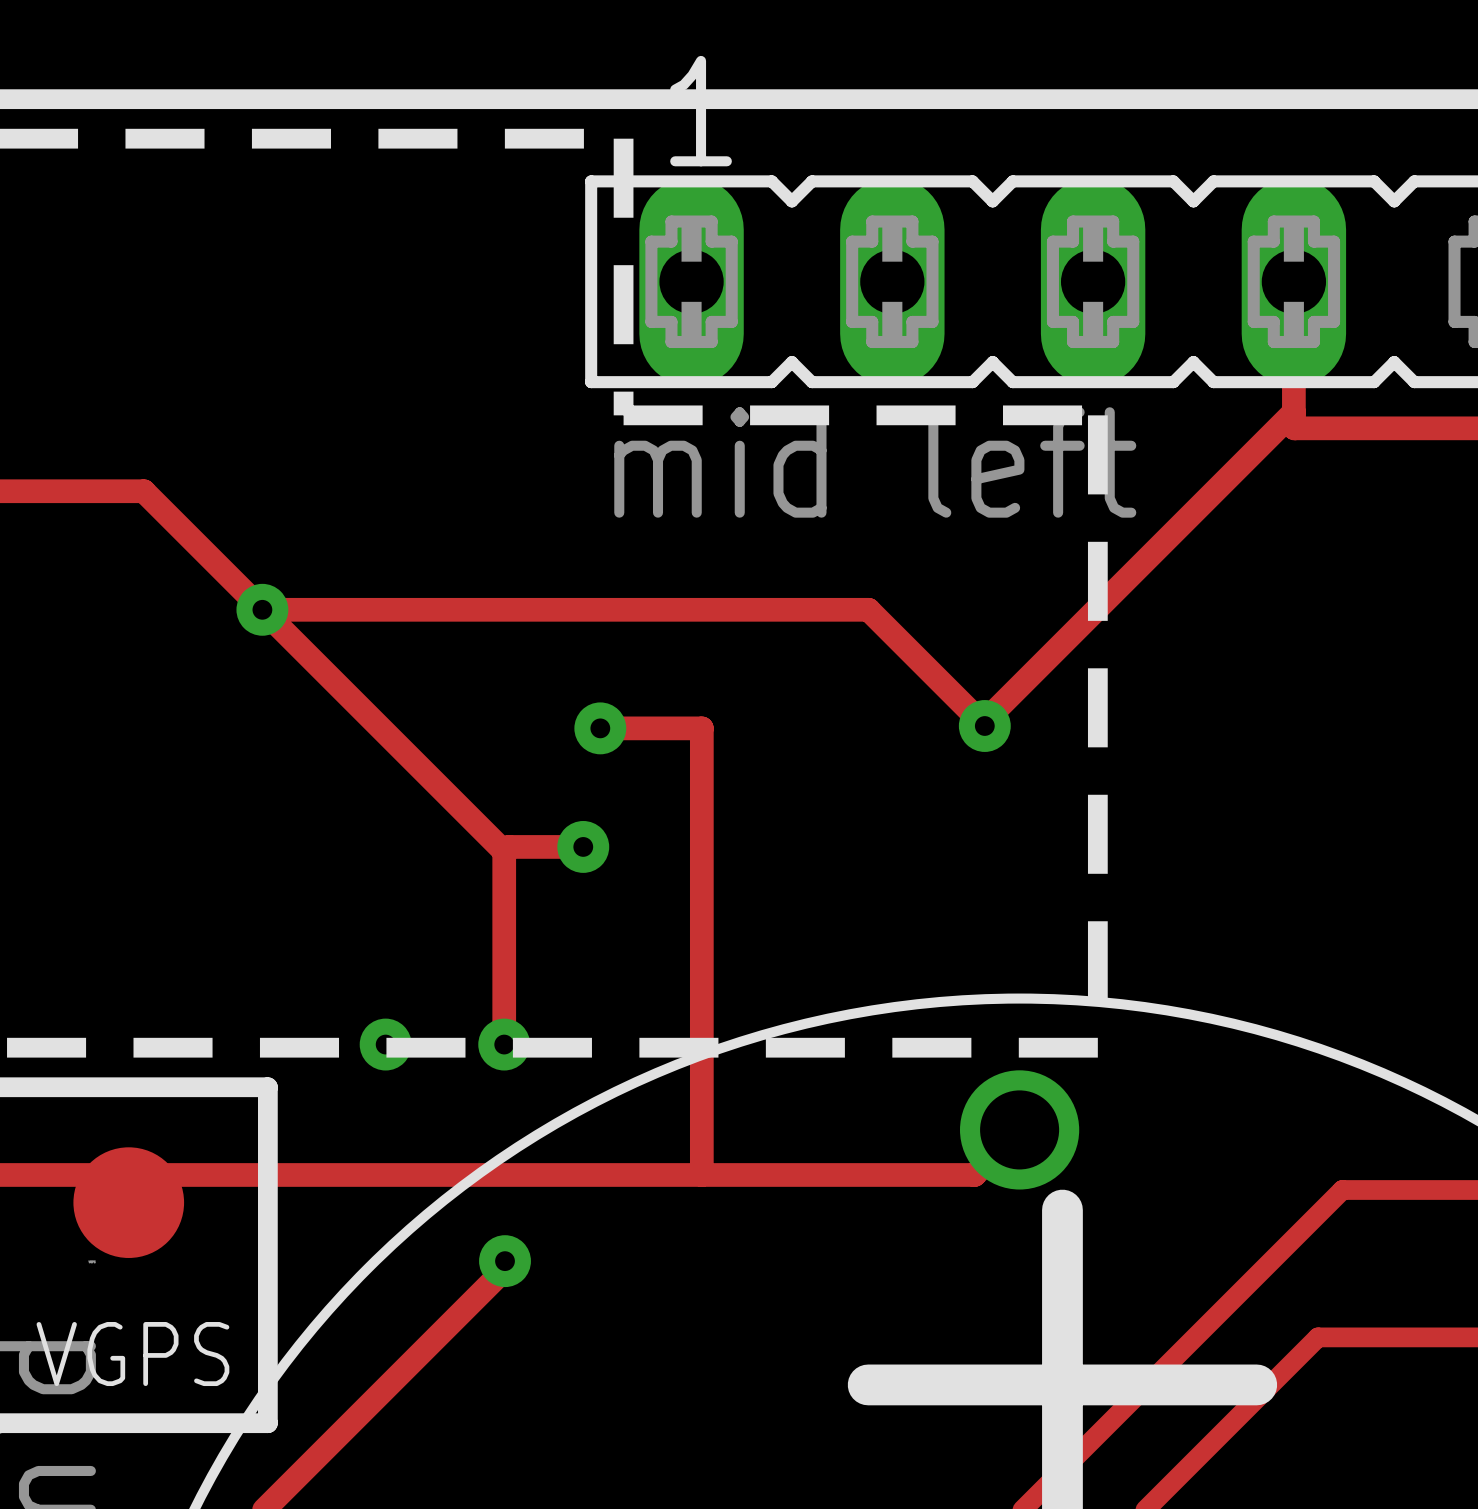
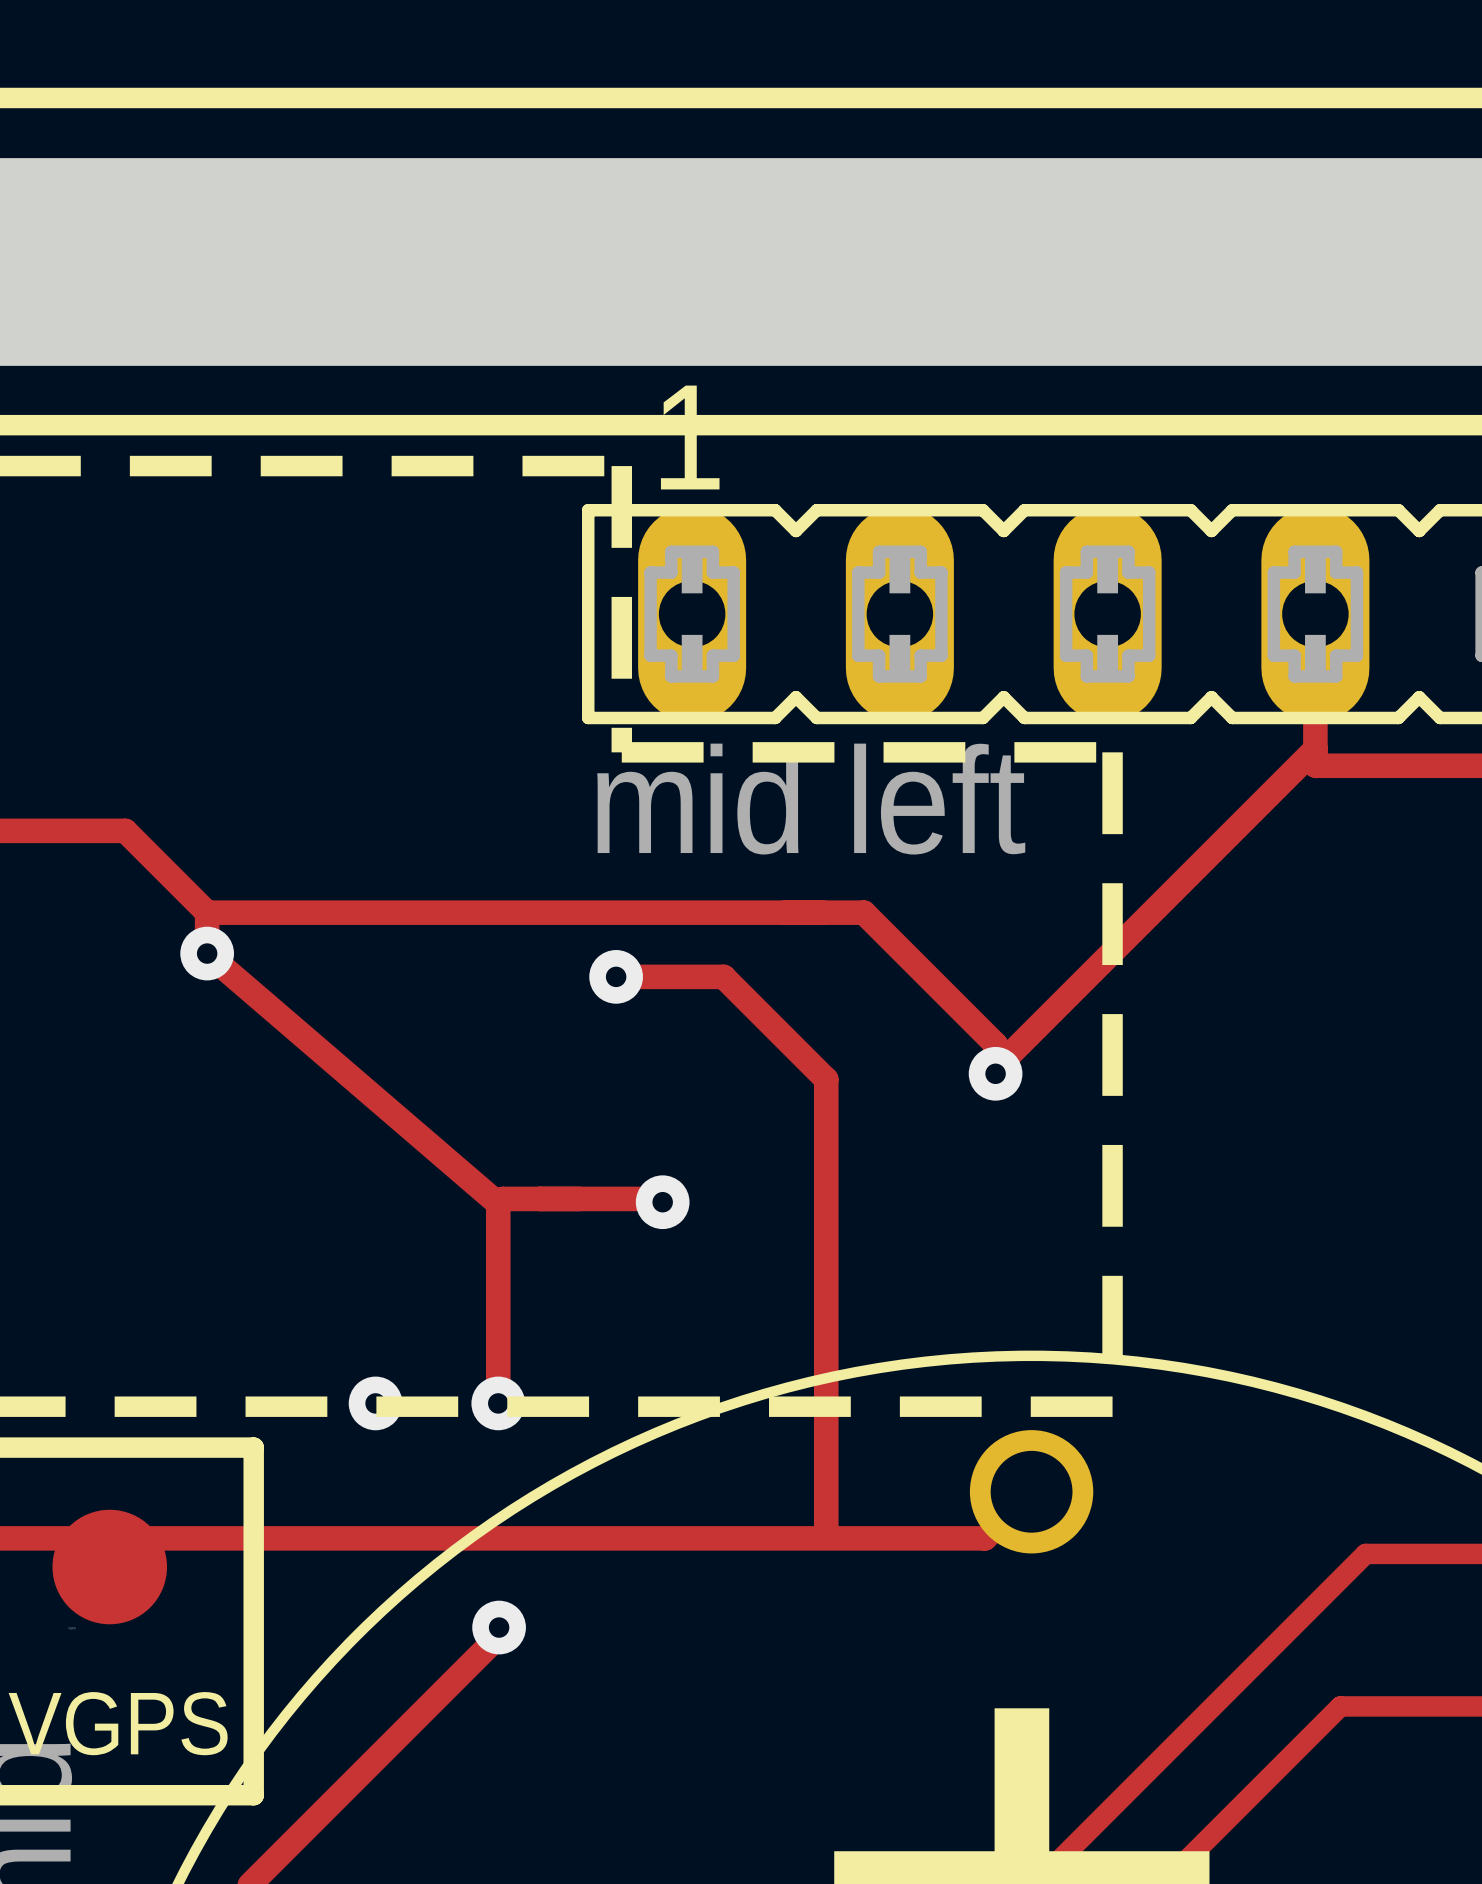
track: (222, 570) (504, 851) -> none
track: (262, 609) (868, 609) (984, 726) -> (498, 1203) (207, 953) (207, 912) (863, 912) (995, 1044) (995, 1073)
via position: (262, 609) -> (207, 953)
track: none -> (616, 976) (723, 976) (826, 1079) (826, 1529)
via: none -> (616, 976)
track: (600, 728) (701, 728) (701, 1174) -> none
via: (600, 728) -> none
track: none -> (580, 1198) (659, 1198) (662, 1202)
via: (583, 846) -> none
via: none -> (662, 1202)

